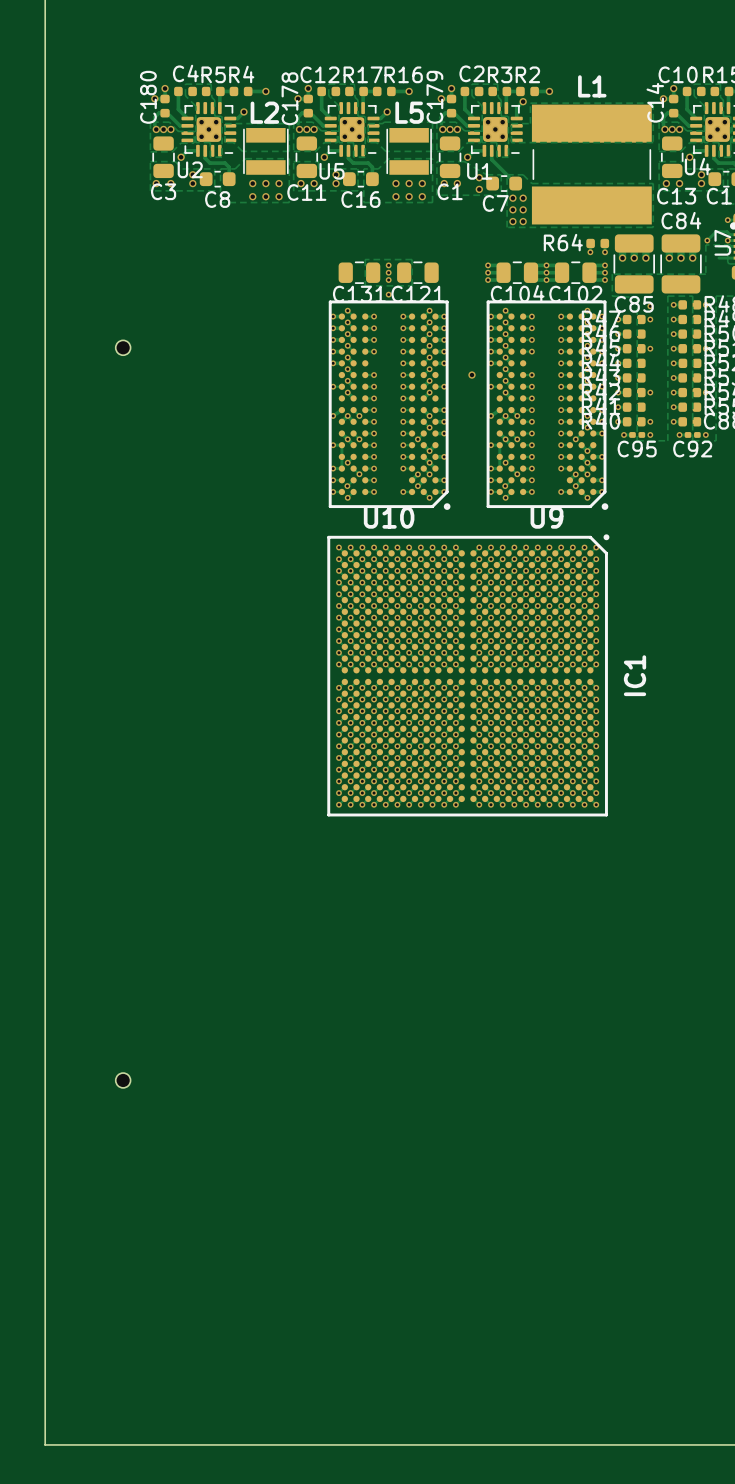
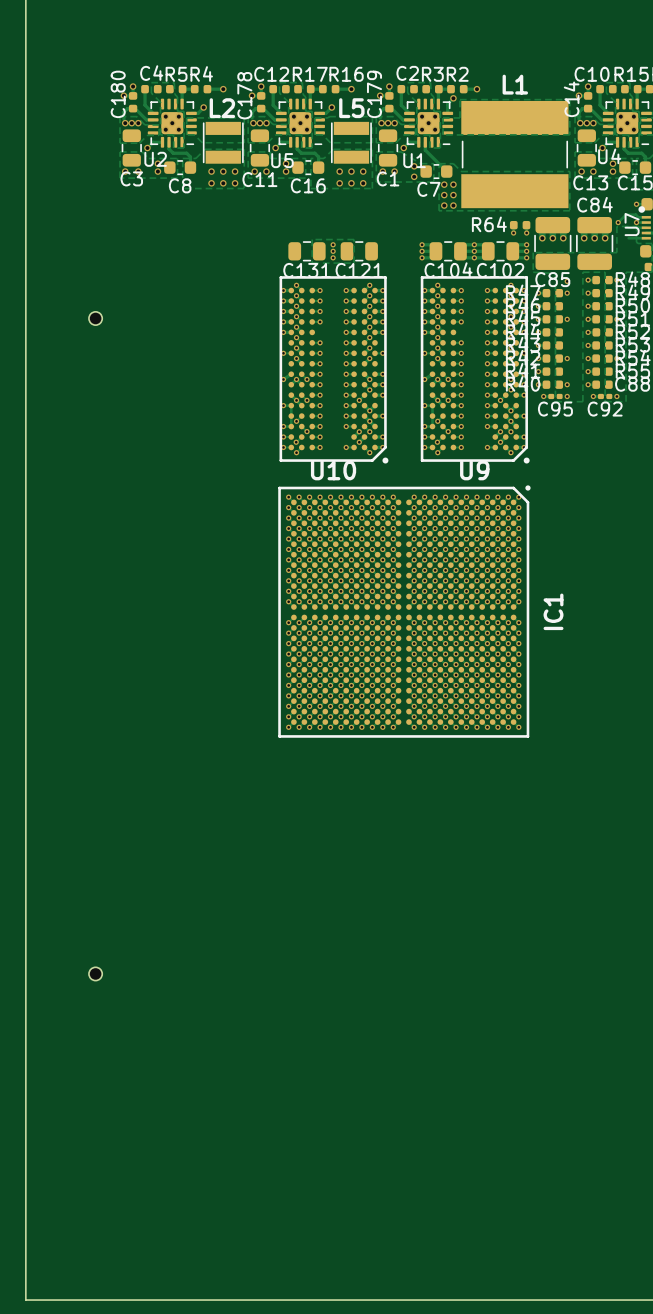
via: (388, 294) -> none
via: (471, 375) -> none

